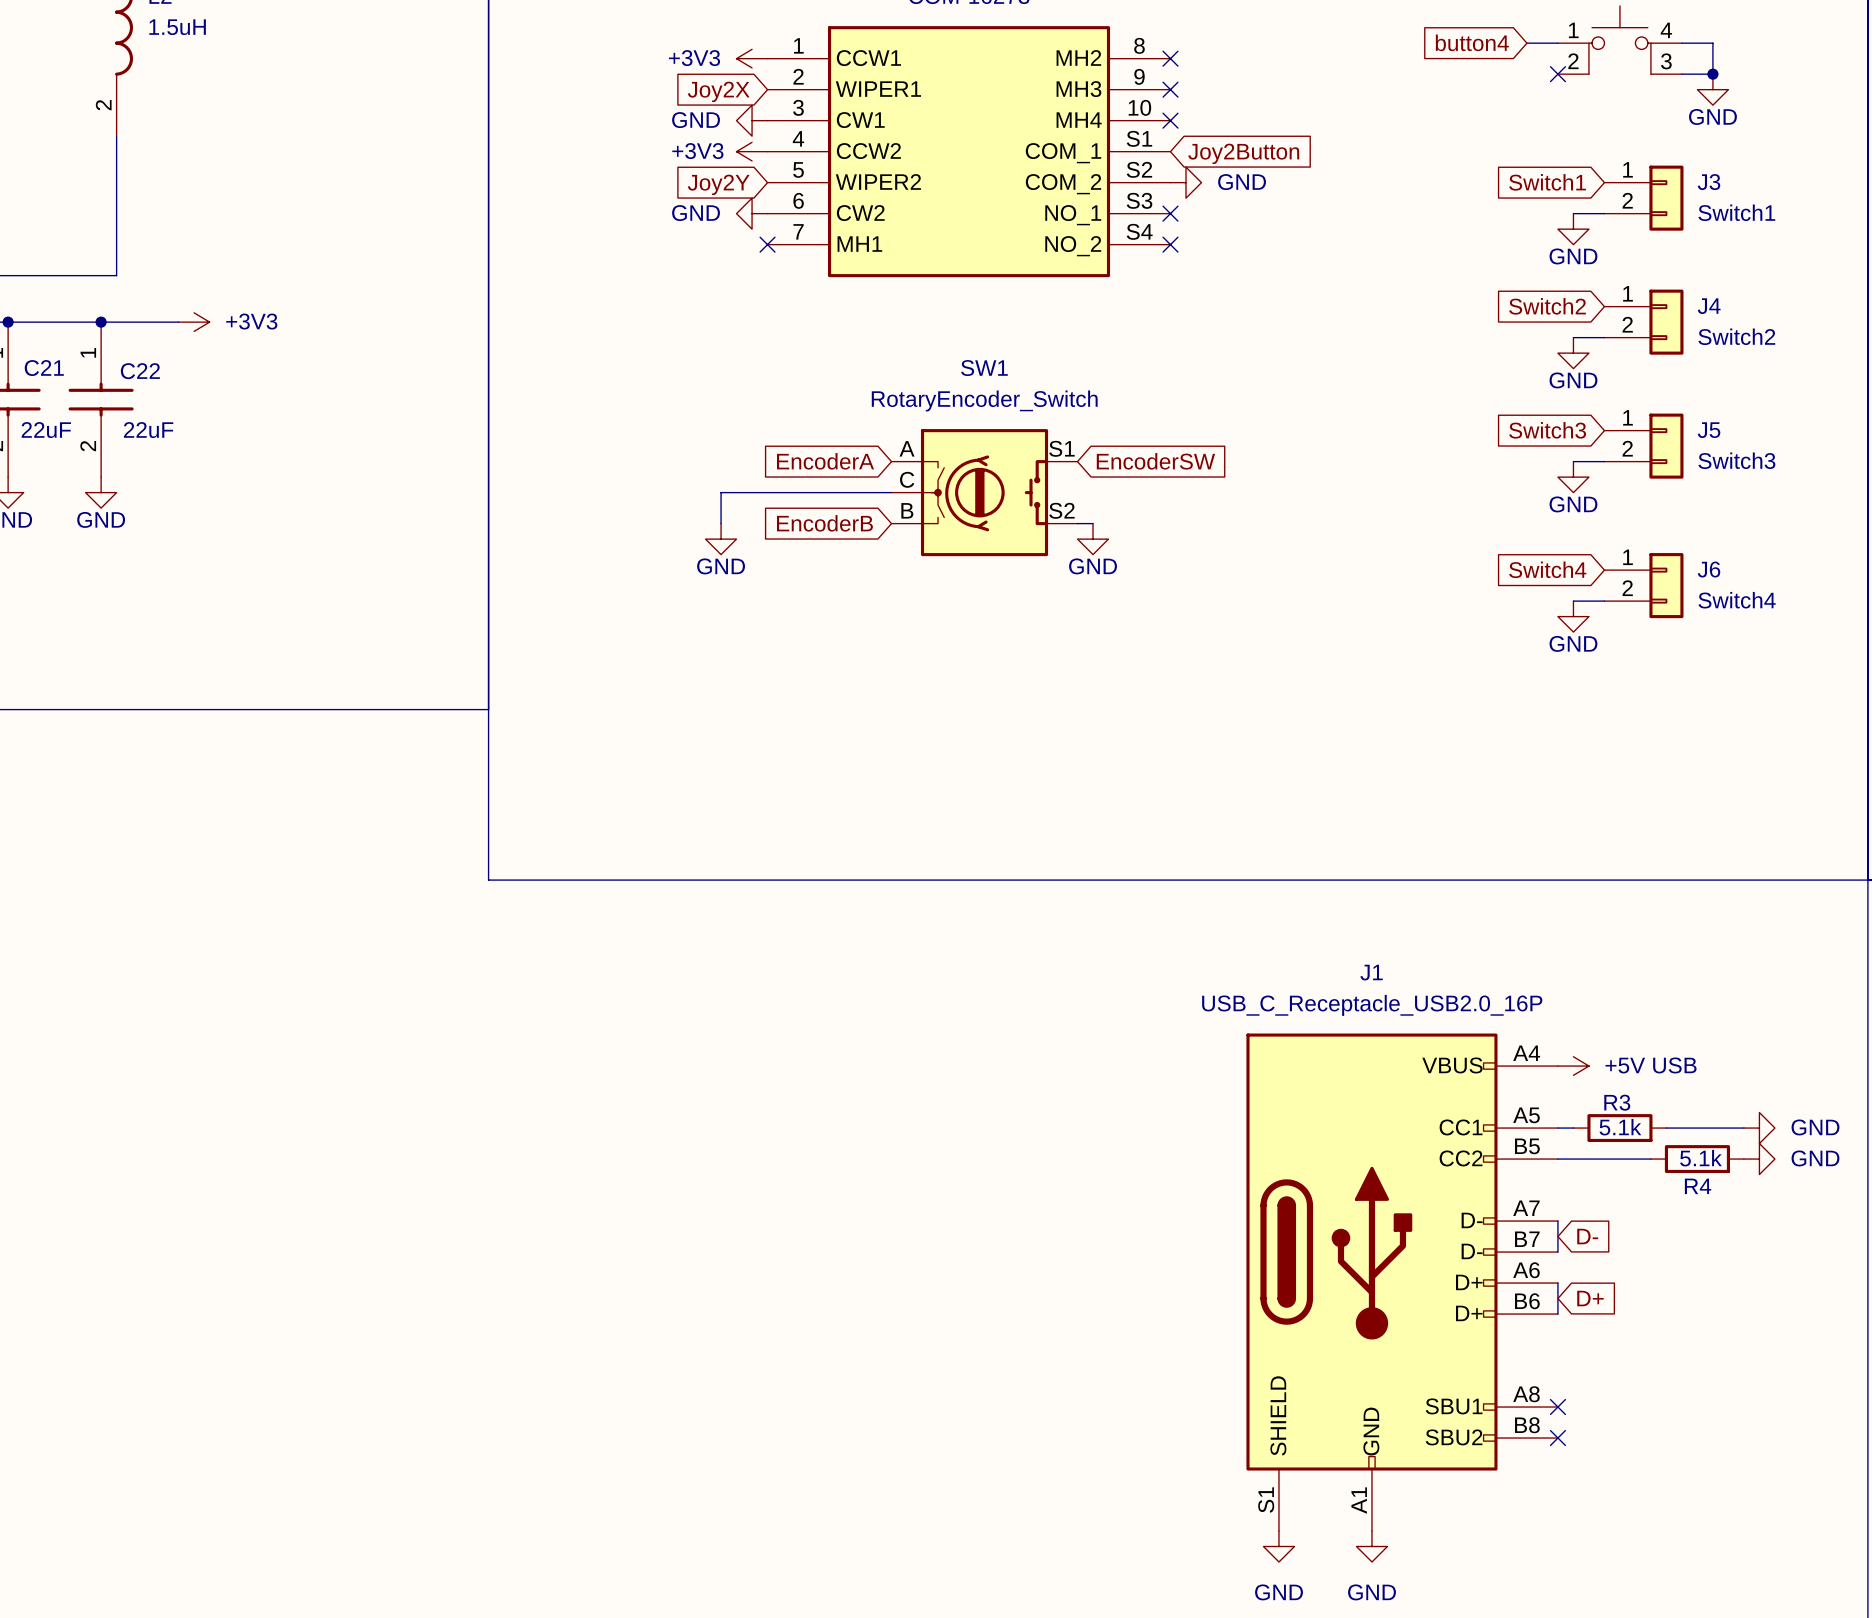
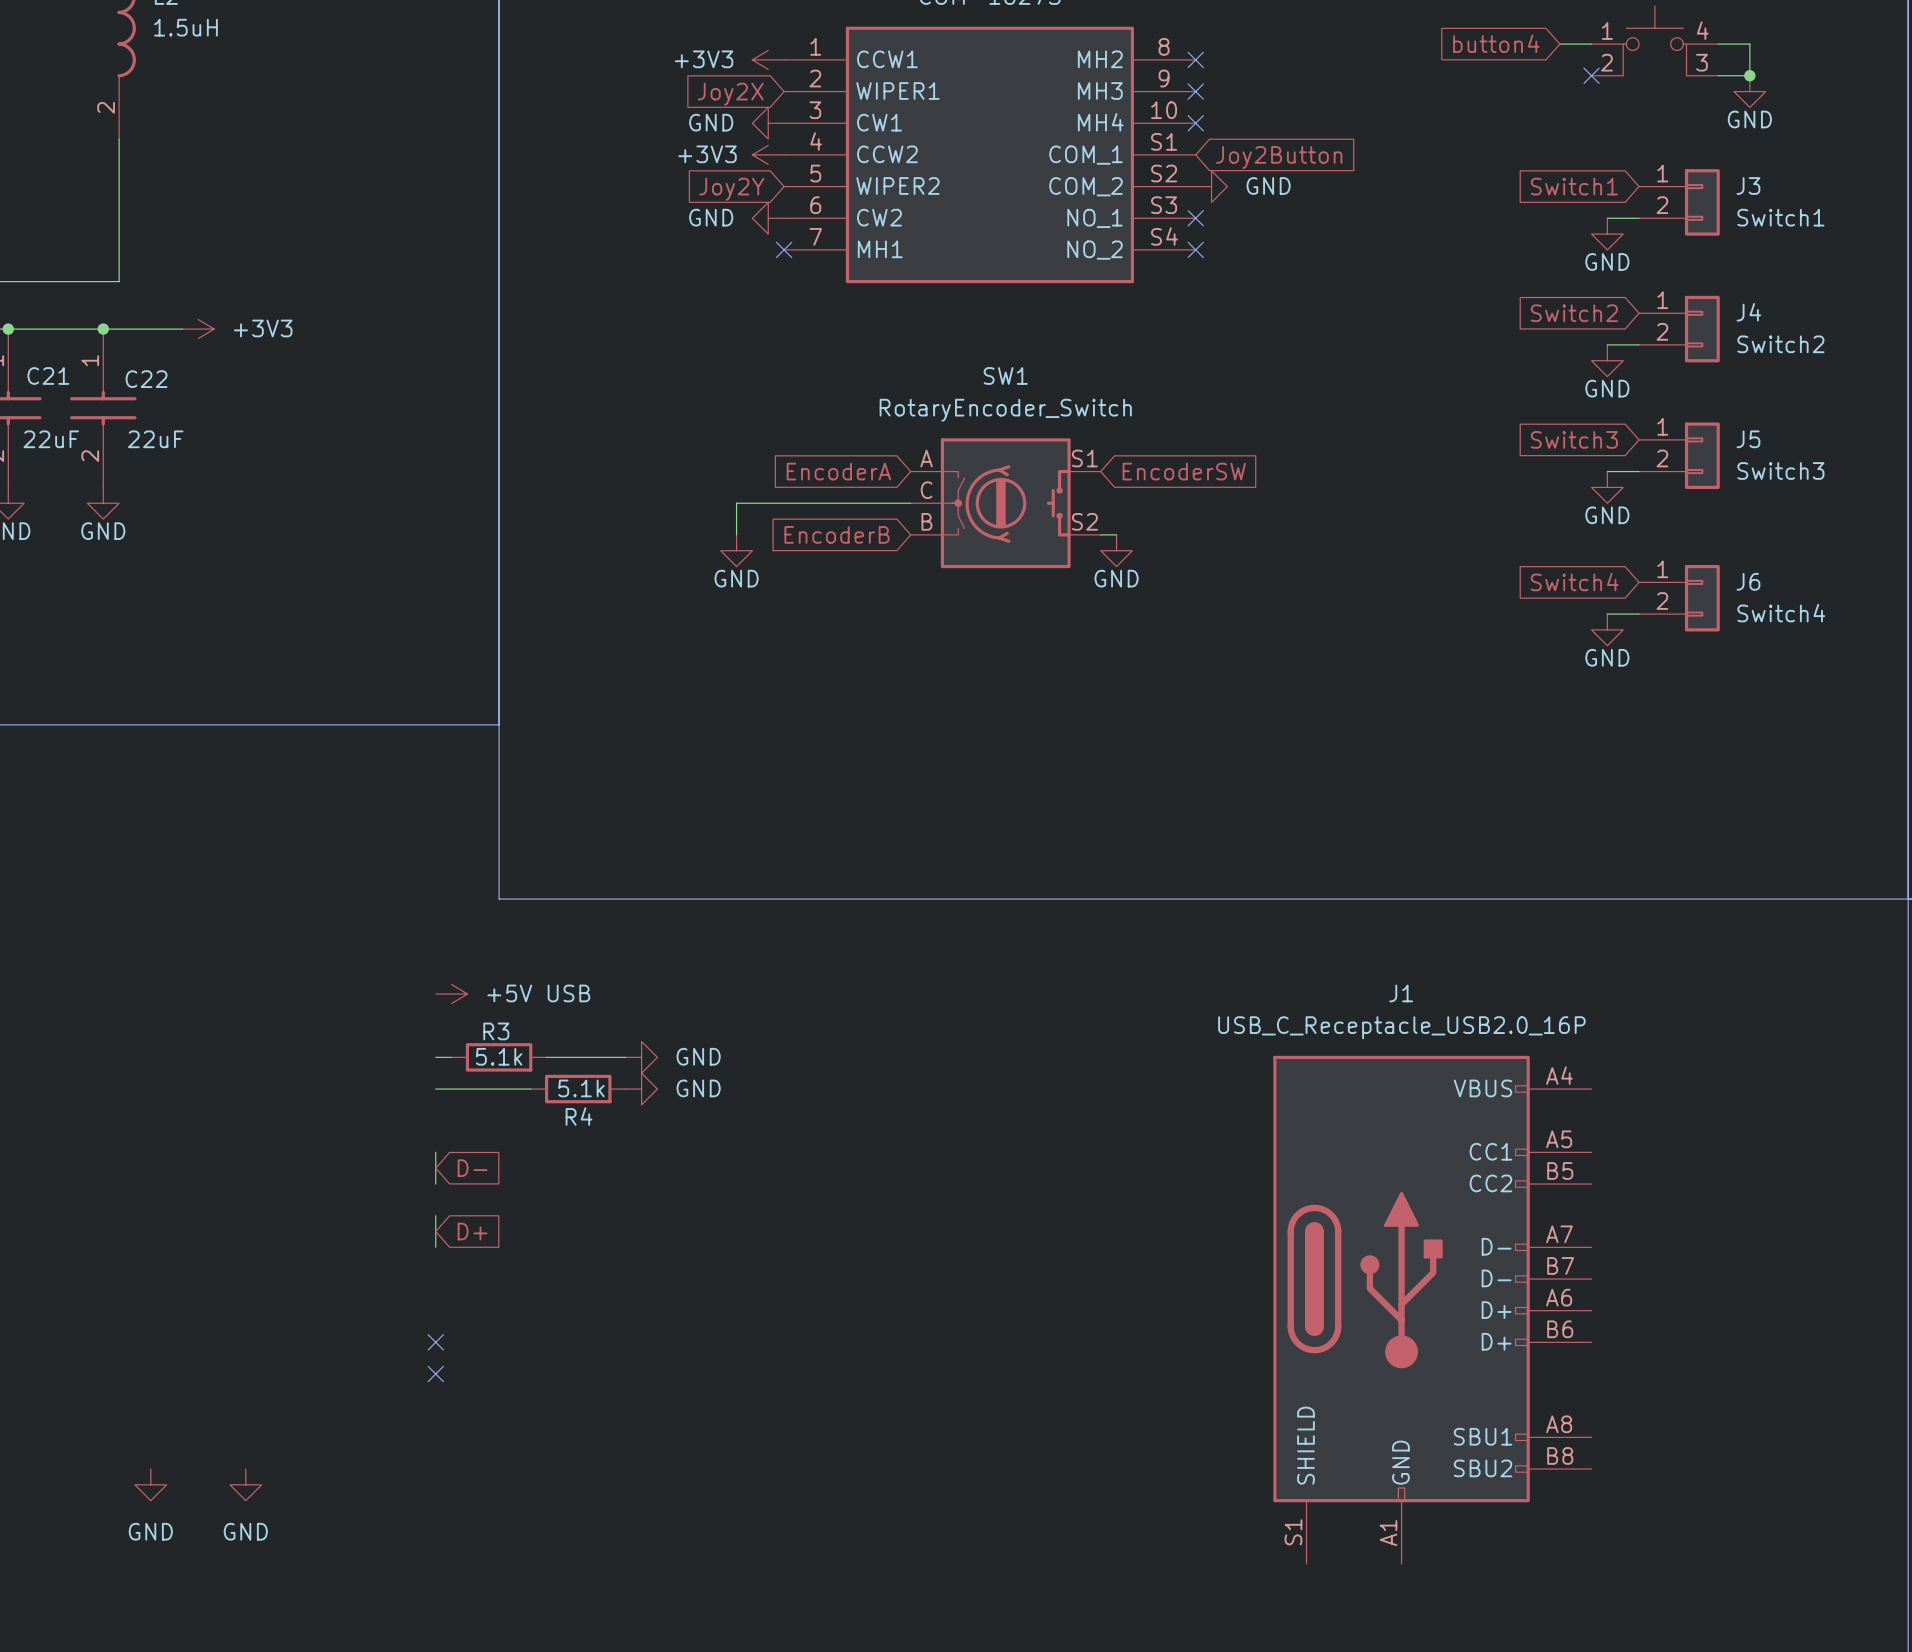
power symbol: none -> +5V USB (451, 994)
wire: none -> (435, 1057) (451, 1057)
wire: none -> (546, 1057) (625, 1057)
power symbol: none -> GND (641, 1057)
wire: none -> (435, 1089) (530, 1089)
power symbol: none -> GND (641, 1089)
power symbol: +5V USB (1573, 1066) -> none
wire: none -> (435, 1152) (435, 1184)
wire: (1557, 1128) (1573, 1128) -> none
R3 position: (1619, 1128) -> (499, 1057)
wire: (1666, 1128) (1743, 1128) -> none
power symbol: GND (1759, 1128) -> none
global label: none -> D- (472, 1168)
wire: (1557, 1159) (1650, 1159) -> none
R4 position: (1697, 1159) -> (578, 1089)
power symbol: GND (1759, 1159) -> none
wire: none -> (435, 1215) (435, 1247)
global label: none -> D+ (472, 1231)
wire: (1557, 1221) (1557, 1252) -> none
global label: D- (1587, 1236) -> none
wire: (1557, 1283) (1557, 1314) -> none
global label: D+ (1590, 1298) -> none
no-connect mark: none -> (435, 1342)
no-connect mark: none -> (435, 1374)
no-connect mark: (1557, 1407) -> none
no-connect mark: (1557, 1438) -> none
power symbol: none -> GND (150, 1484)
power symbol: none -> GND (245, 1484)
power symbol: GND (1278, 1546) -> none
power symbol: GND (1371, 1546) -> none

